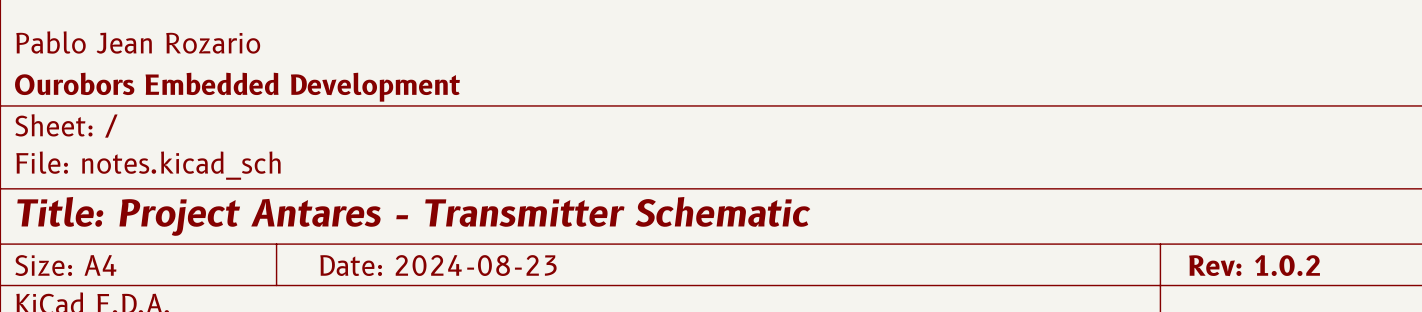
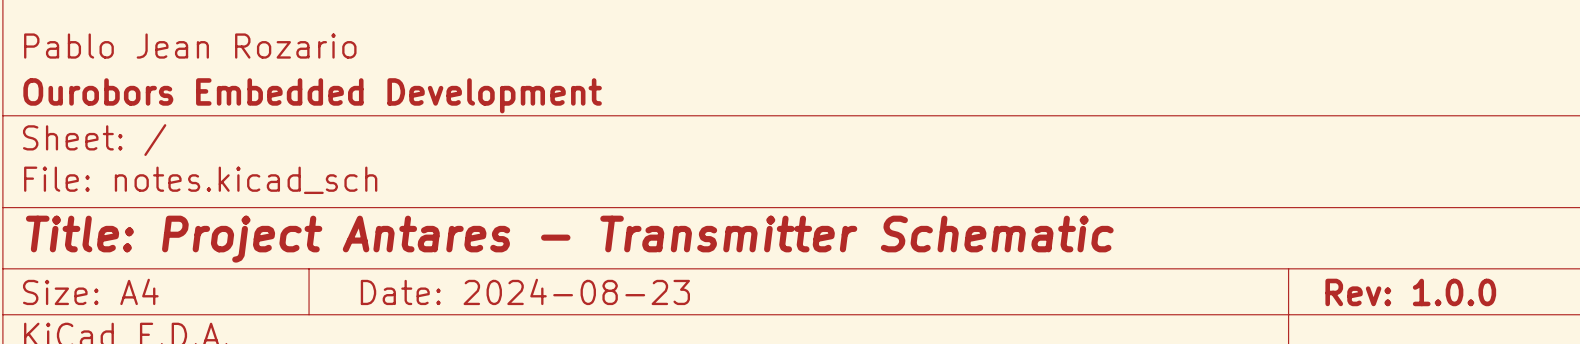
title block: Rev: 1.0.2 (1254, 265) -> Rev: 1.0.0 (1410, 292)

